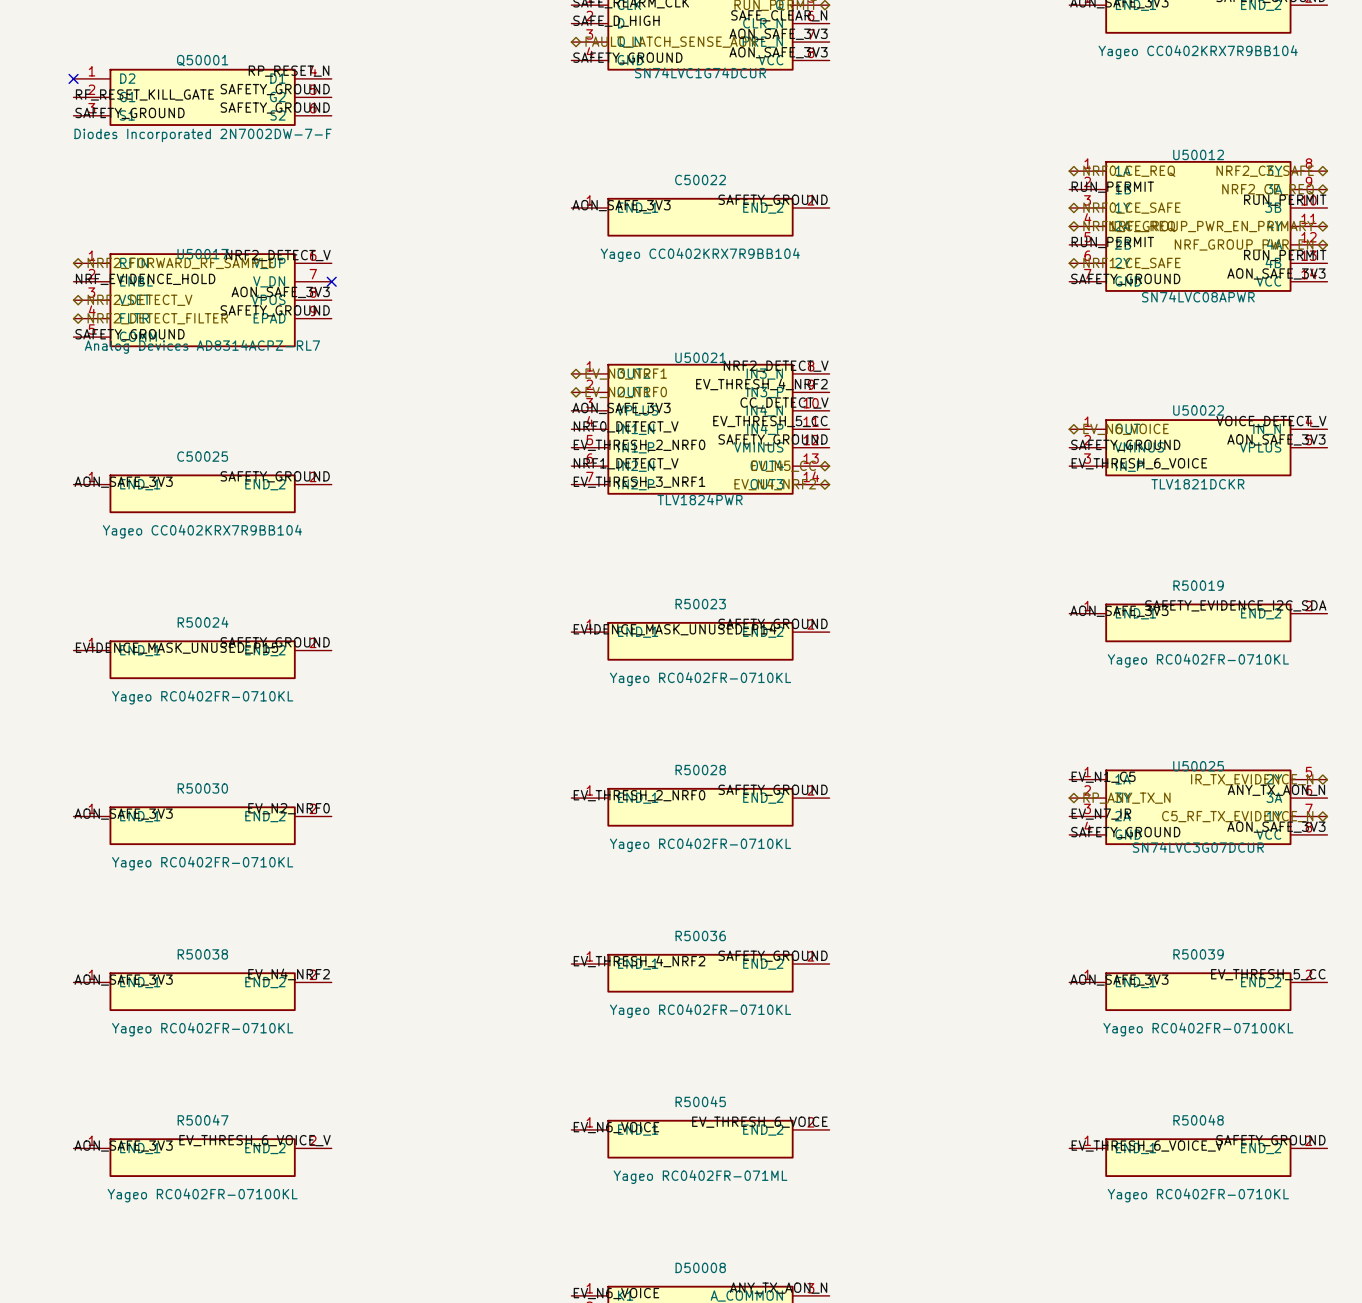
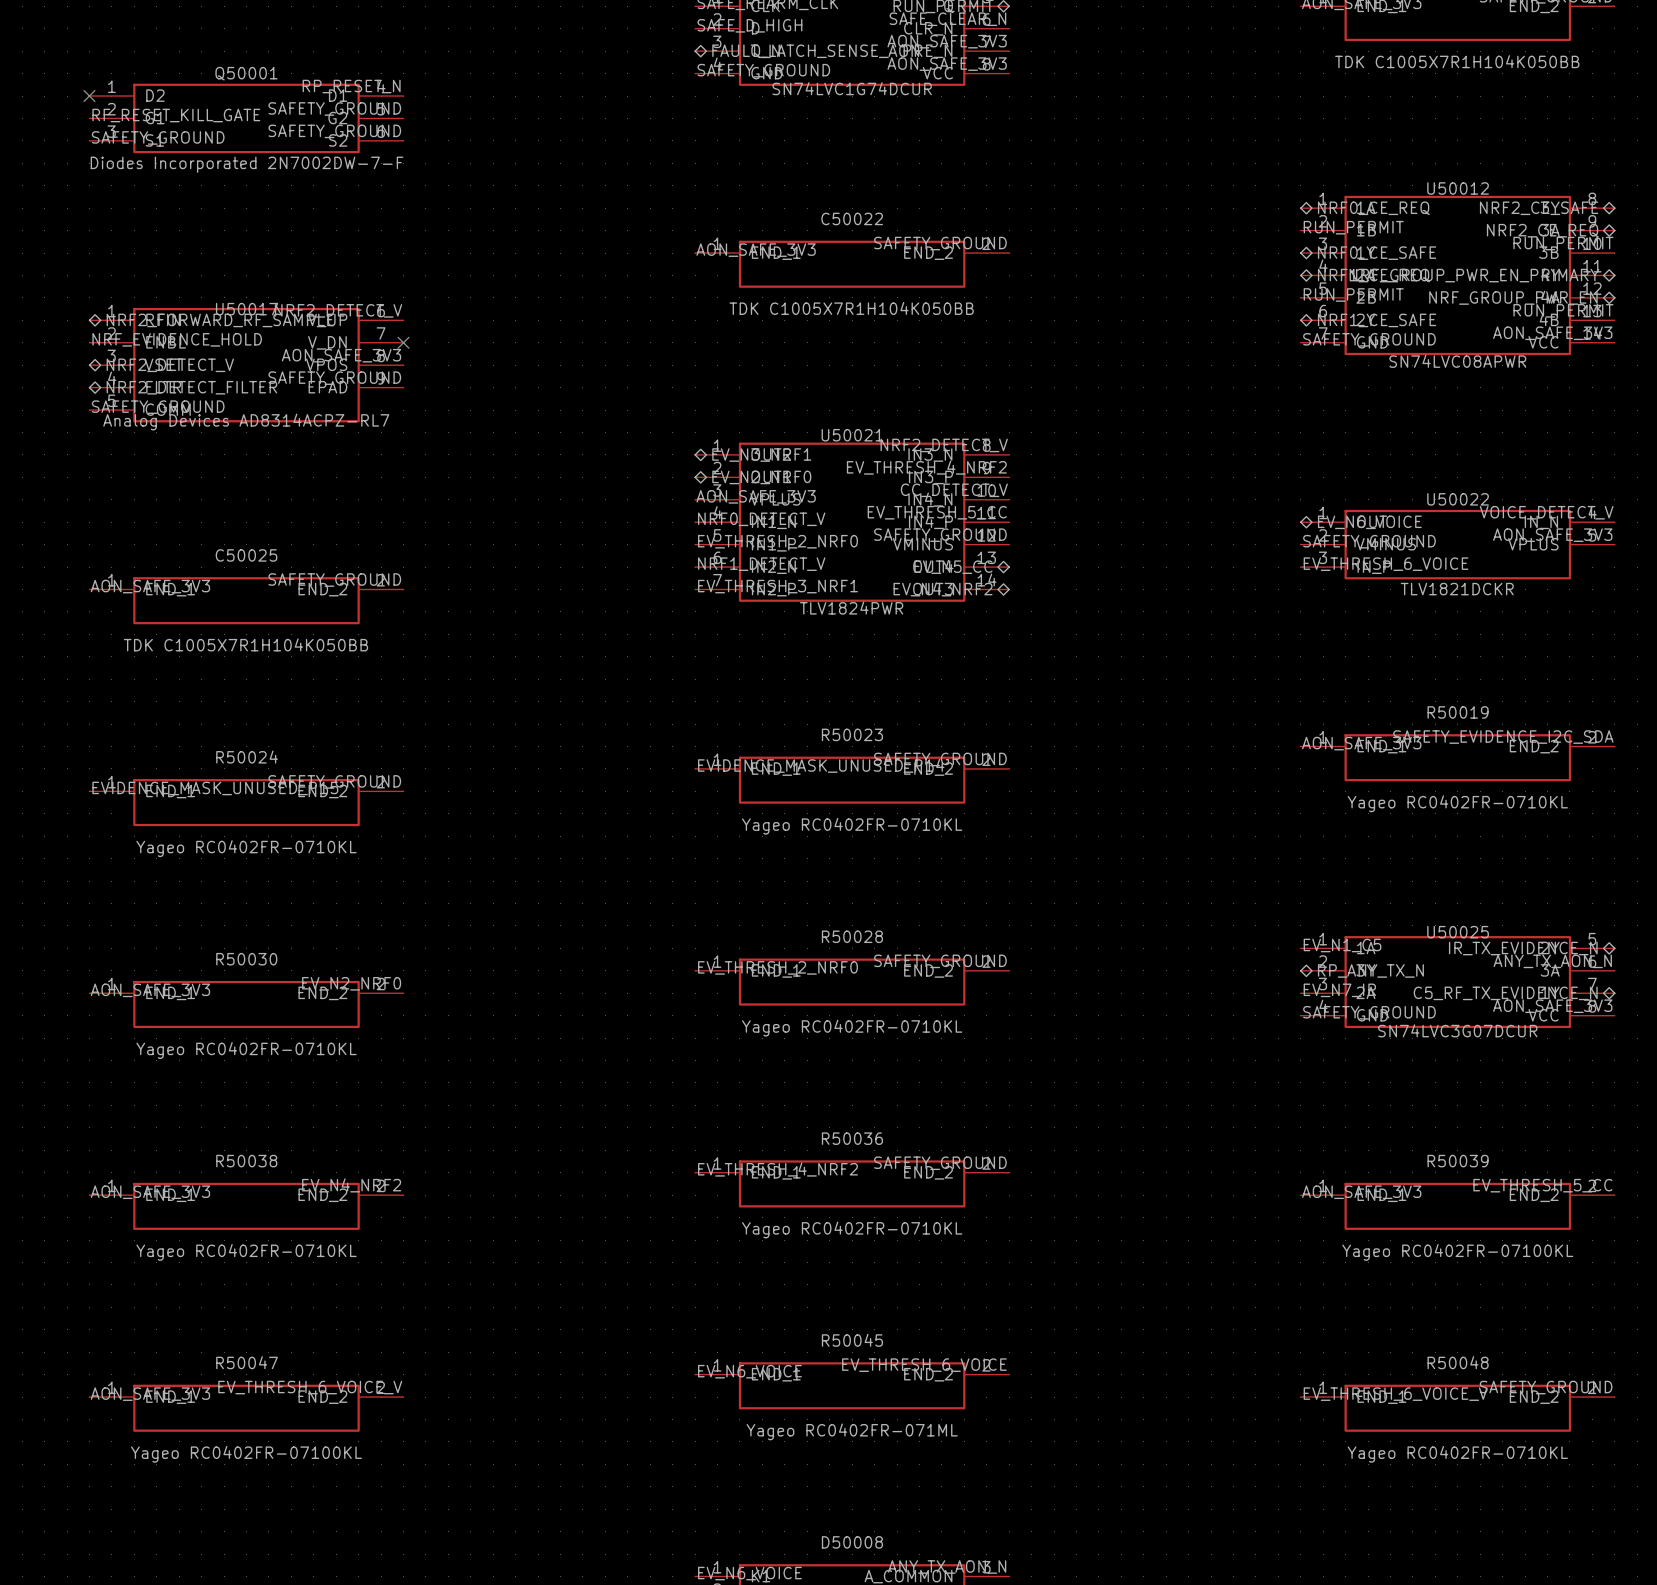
part value: Yageo CC0402KRX7R9BB104 (1198, 52) -> TDK C1005X7R1H104K050BB (1457, 61)
C50022 value: Yageo CC0402KRX7R9BB104 (700, 255) -> TDK C1005X7R1H104K050BB (851, 308)
C50025 value: Yageo CC0402KRX7R9BB104 (202, 531) -> TDK C1005X7R1H104K050BB (245, 644)

